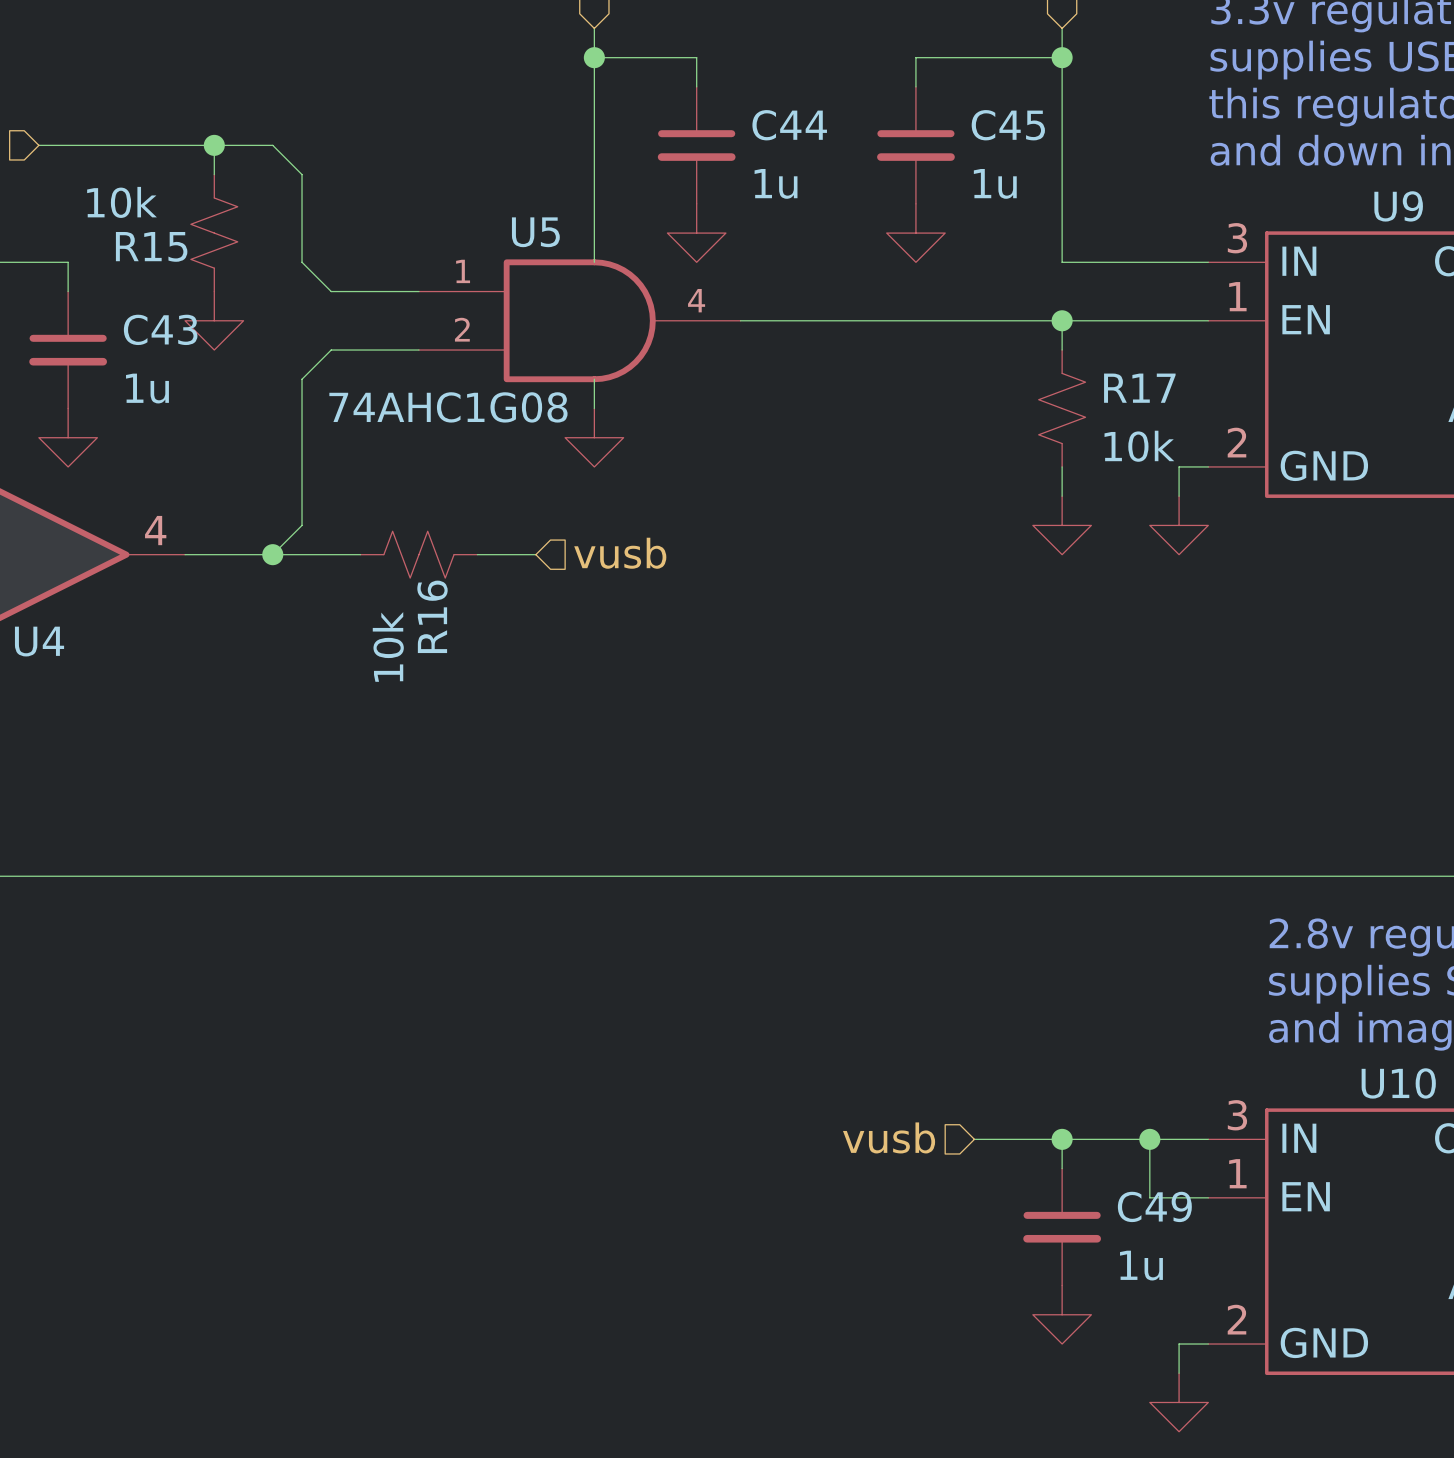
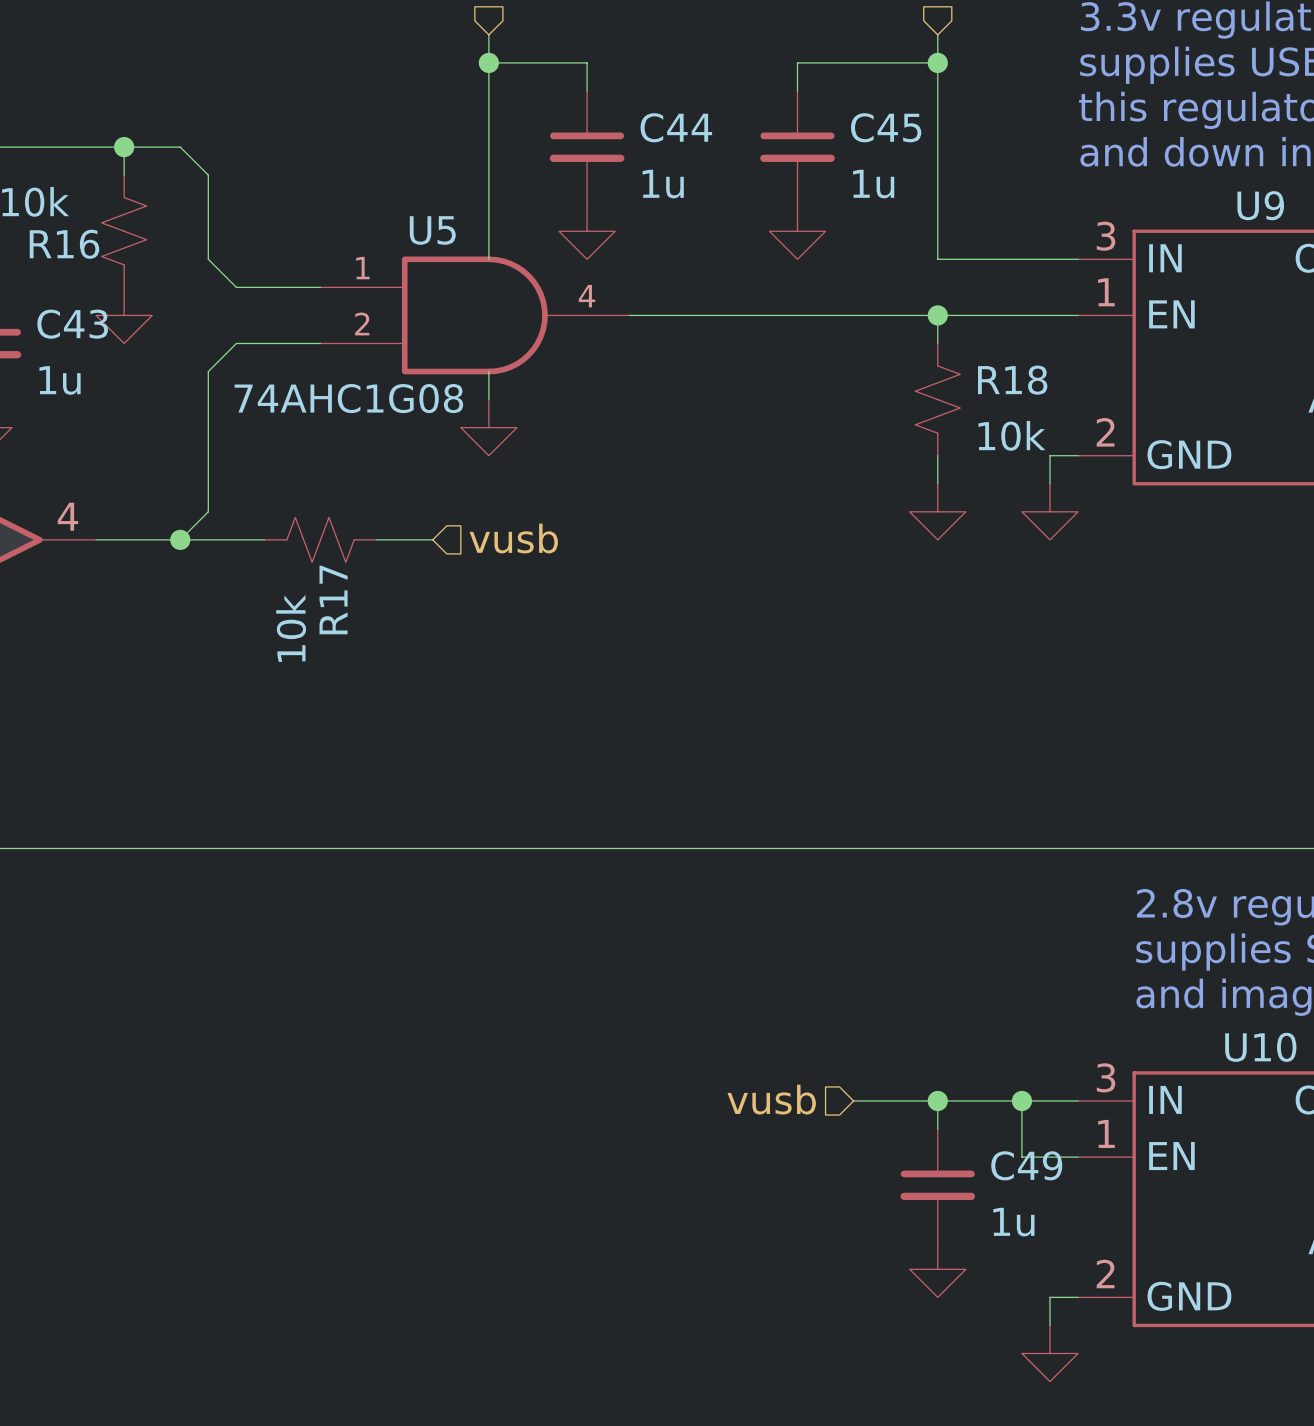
R15 name: R15 (151, 246) -> R16 (64, 244)
R17 name: R17 (1139, 388) -> R18 (1012, 380)
R16 name: R16 (432, 616) -> R17 (333, 599)

